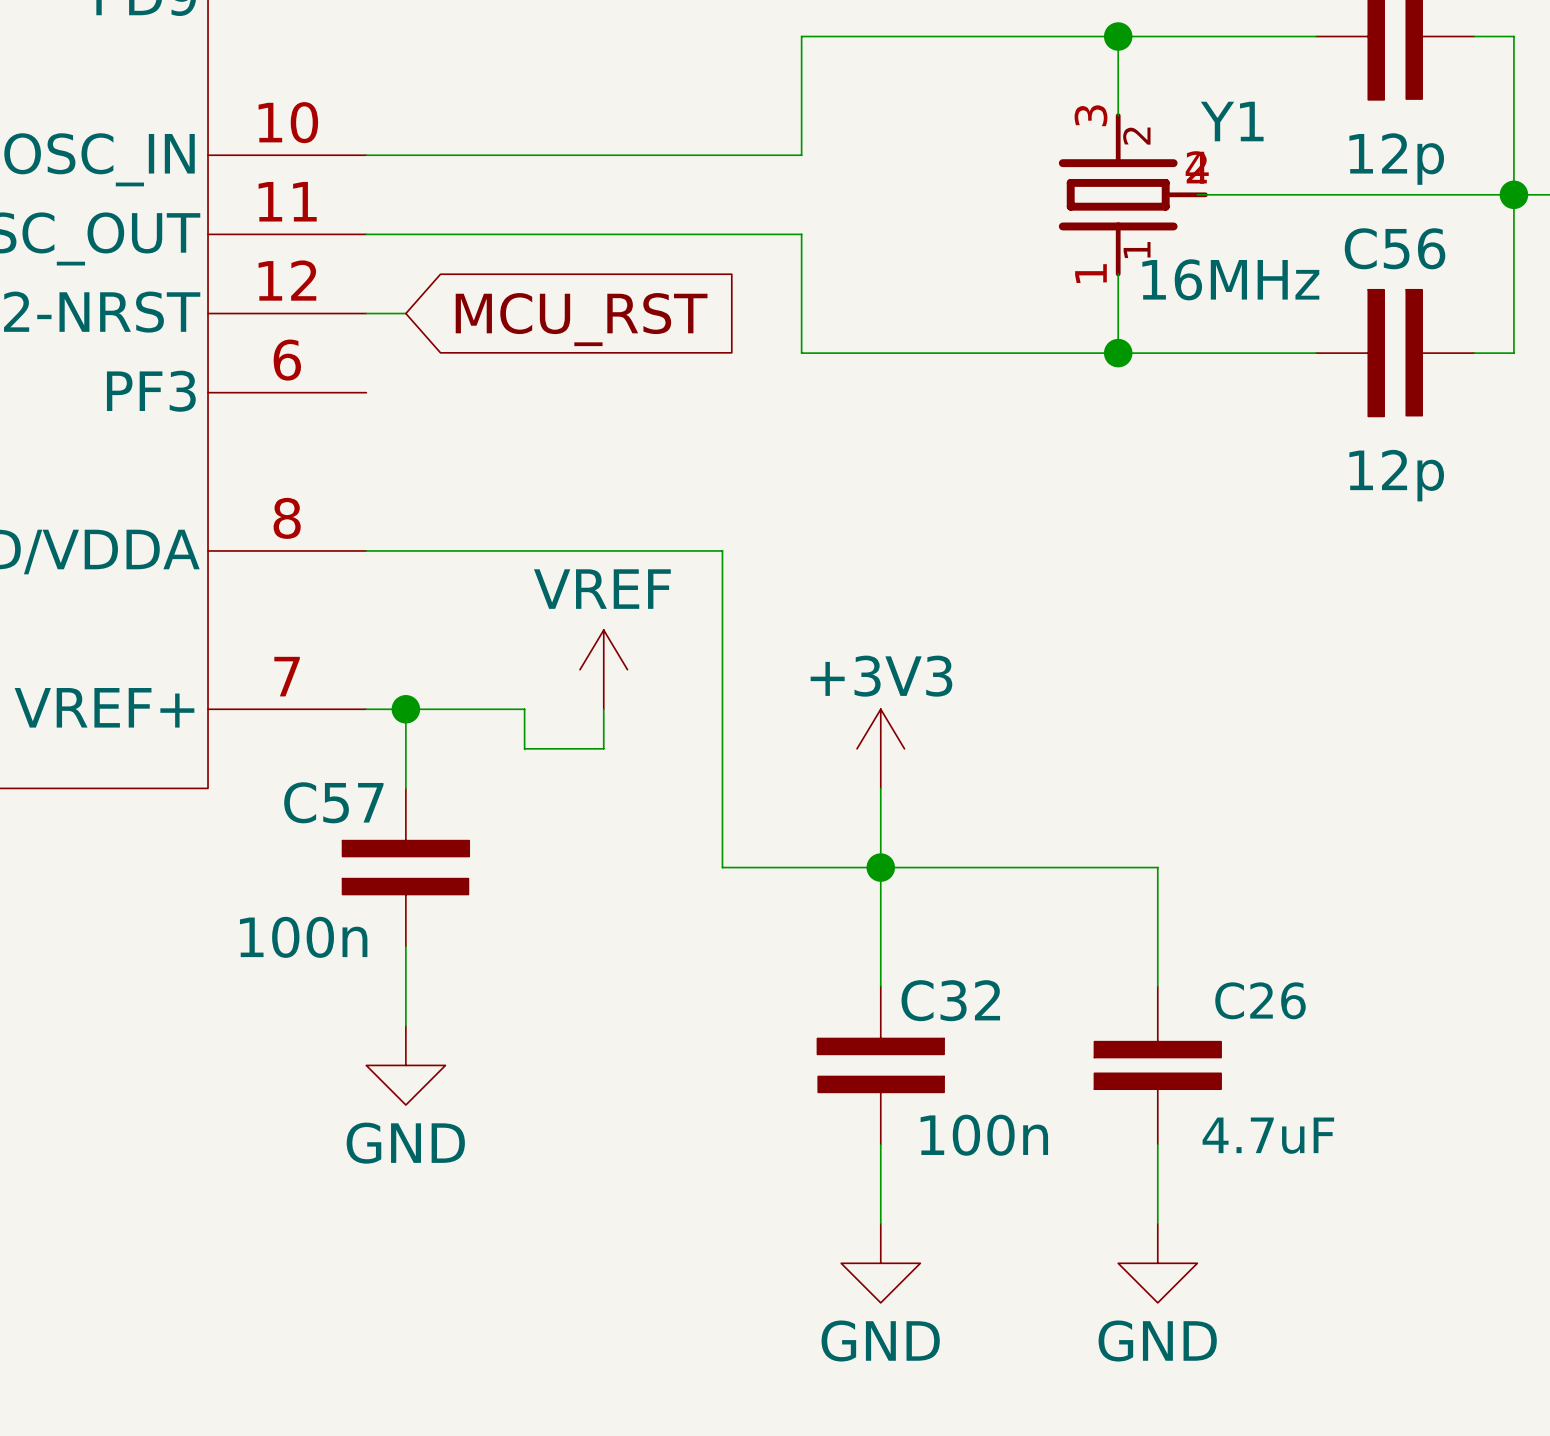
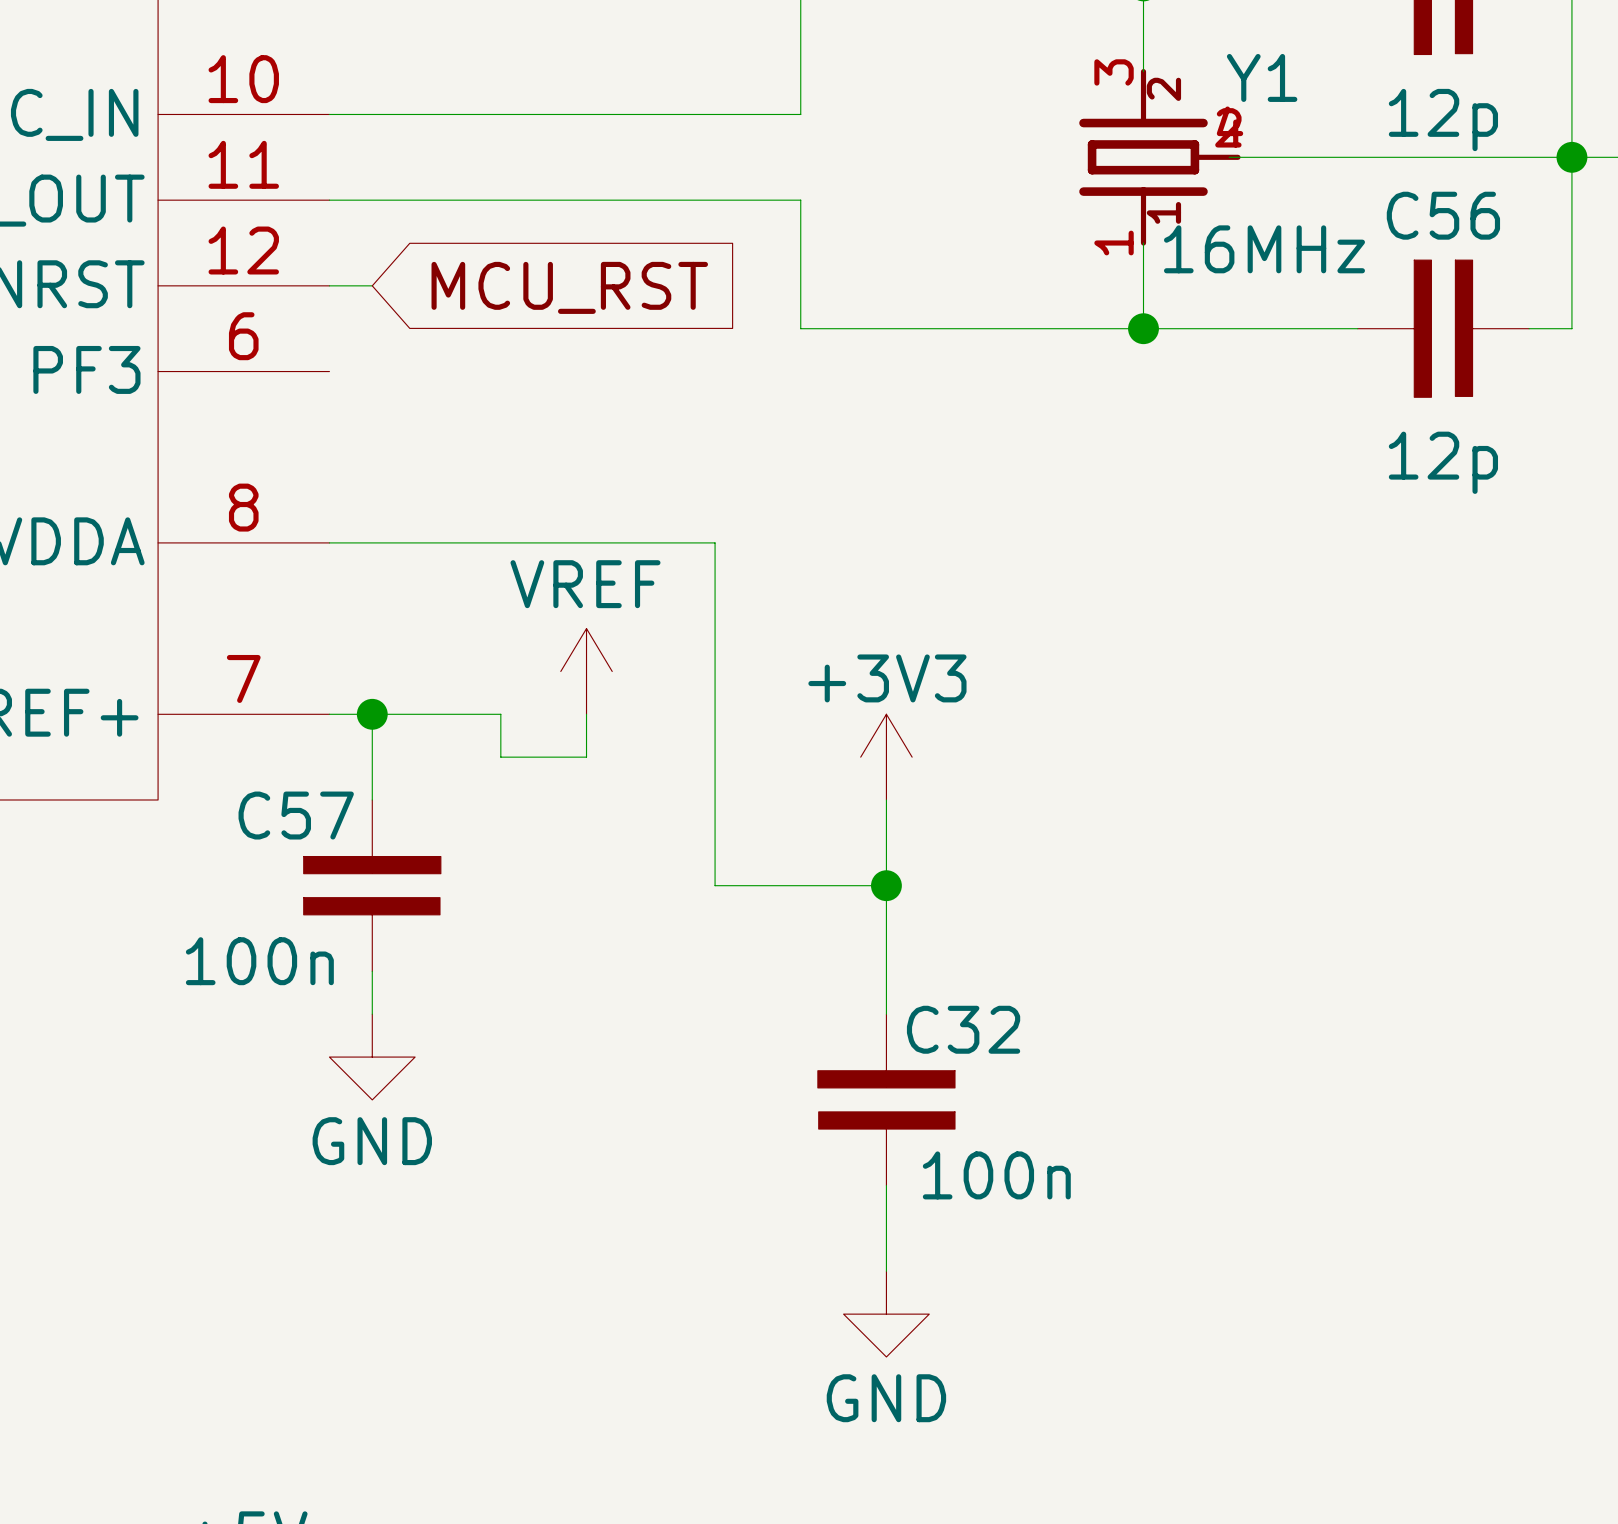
wire: (880, 867) (1157, 867) (1157, 986) -> none
power symbol position: GND (405, 1065) -> GND (372, 1057)
C26: 4.7uF (1157, 1065) -> none
wire: (1157, 1144) (1157, 1223) -> none
power symbol: GND (1157, 1263) -> none

